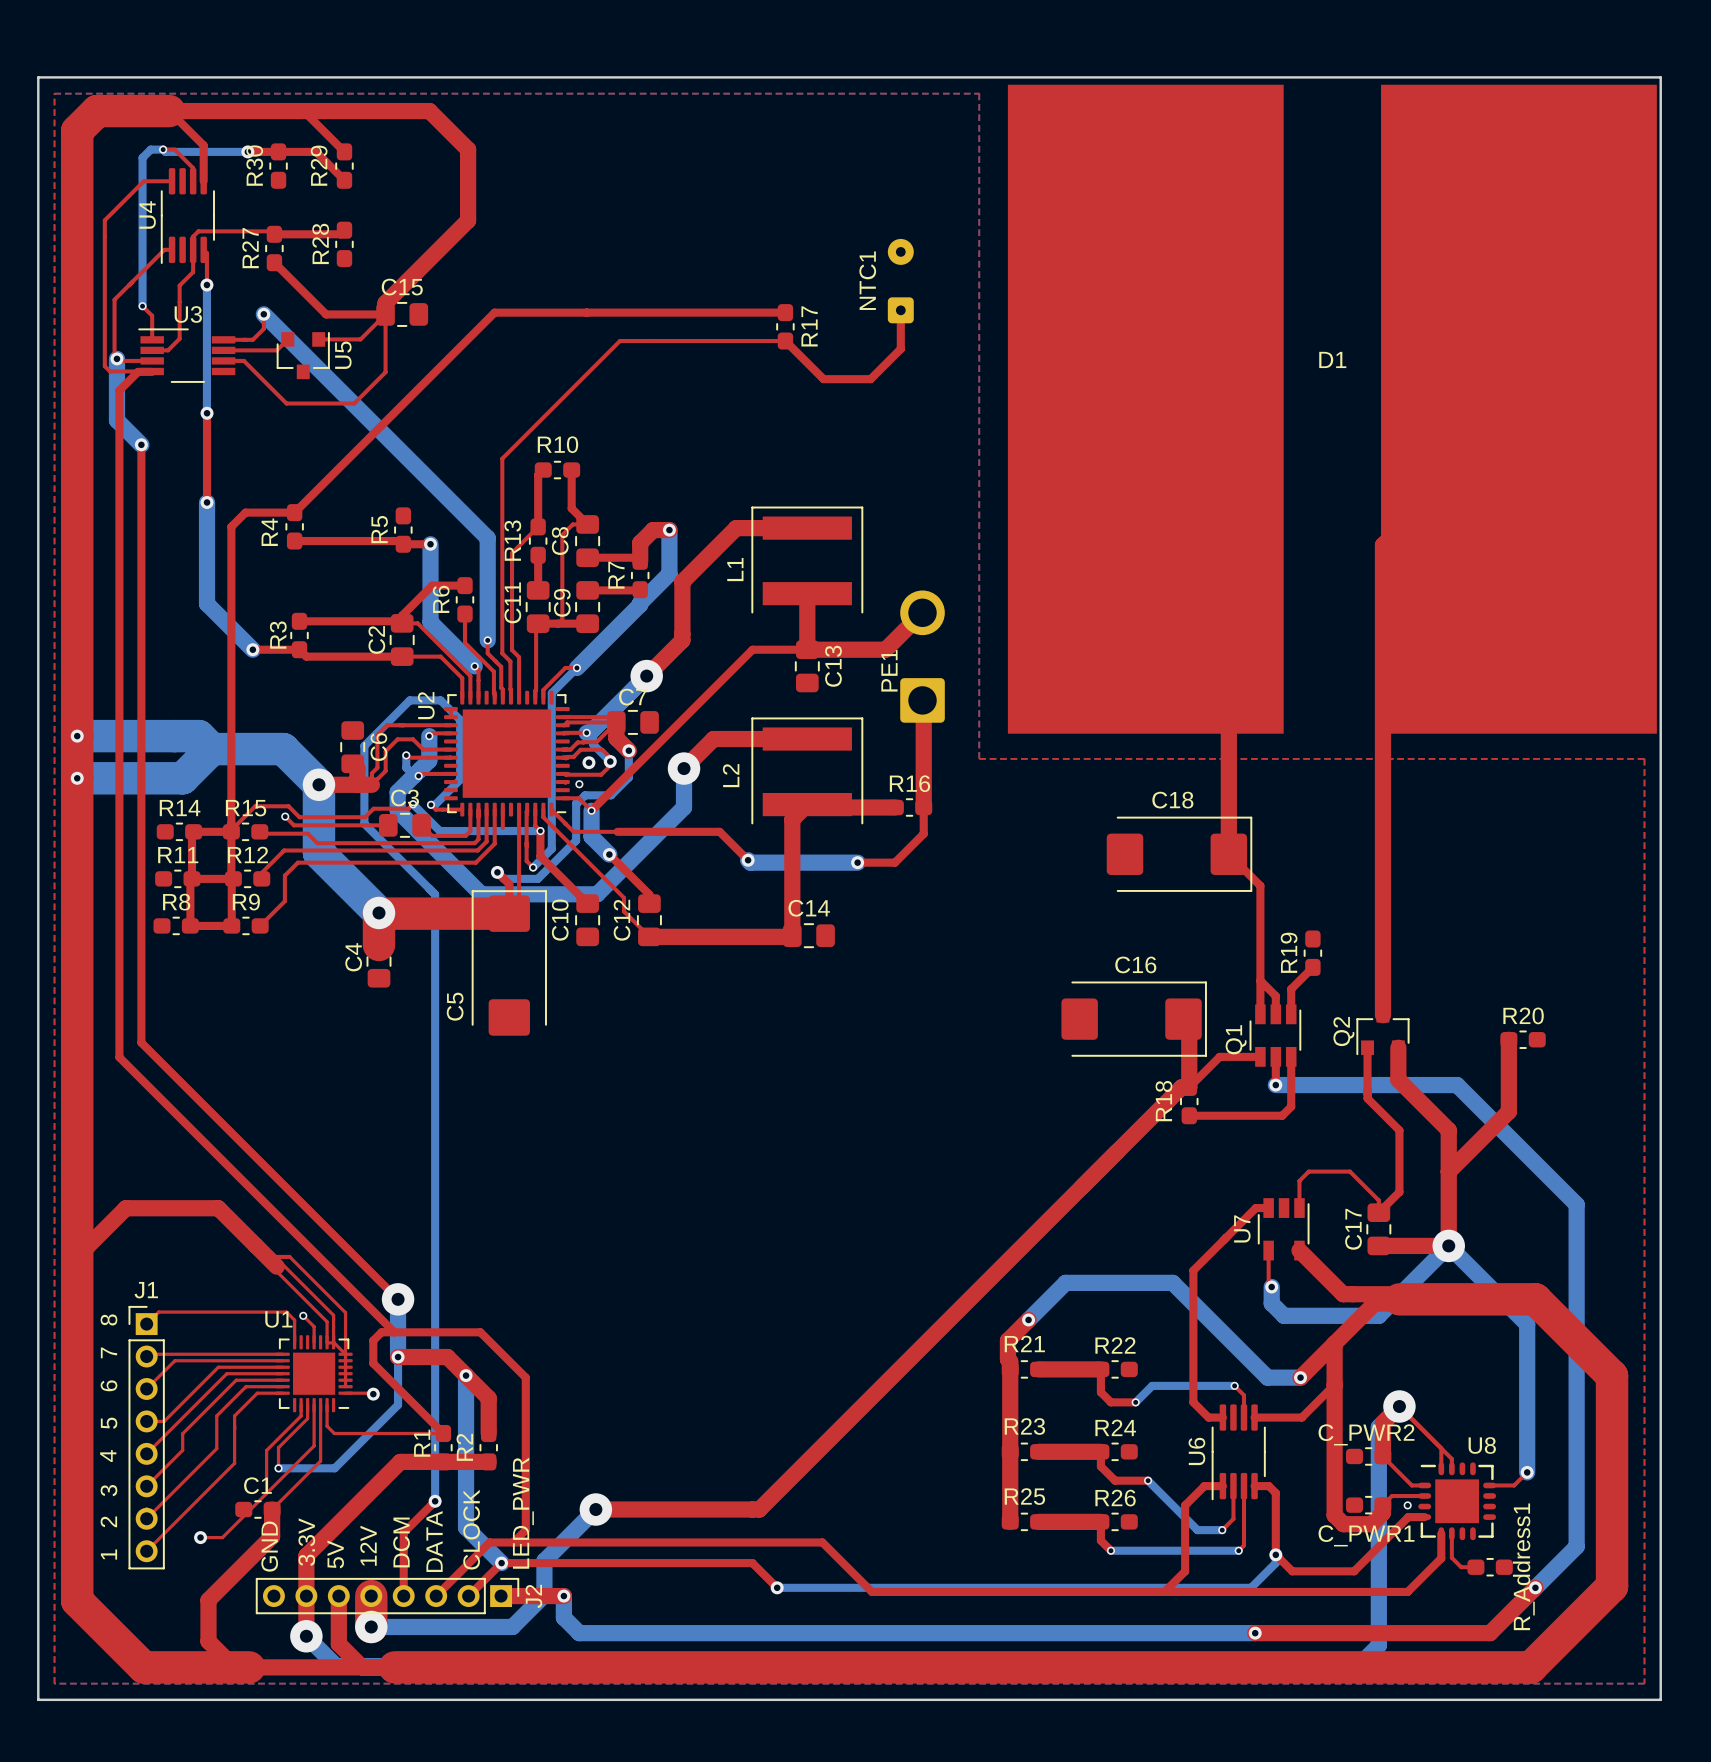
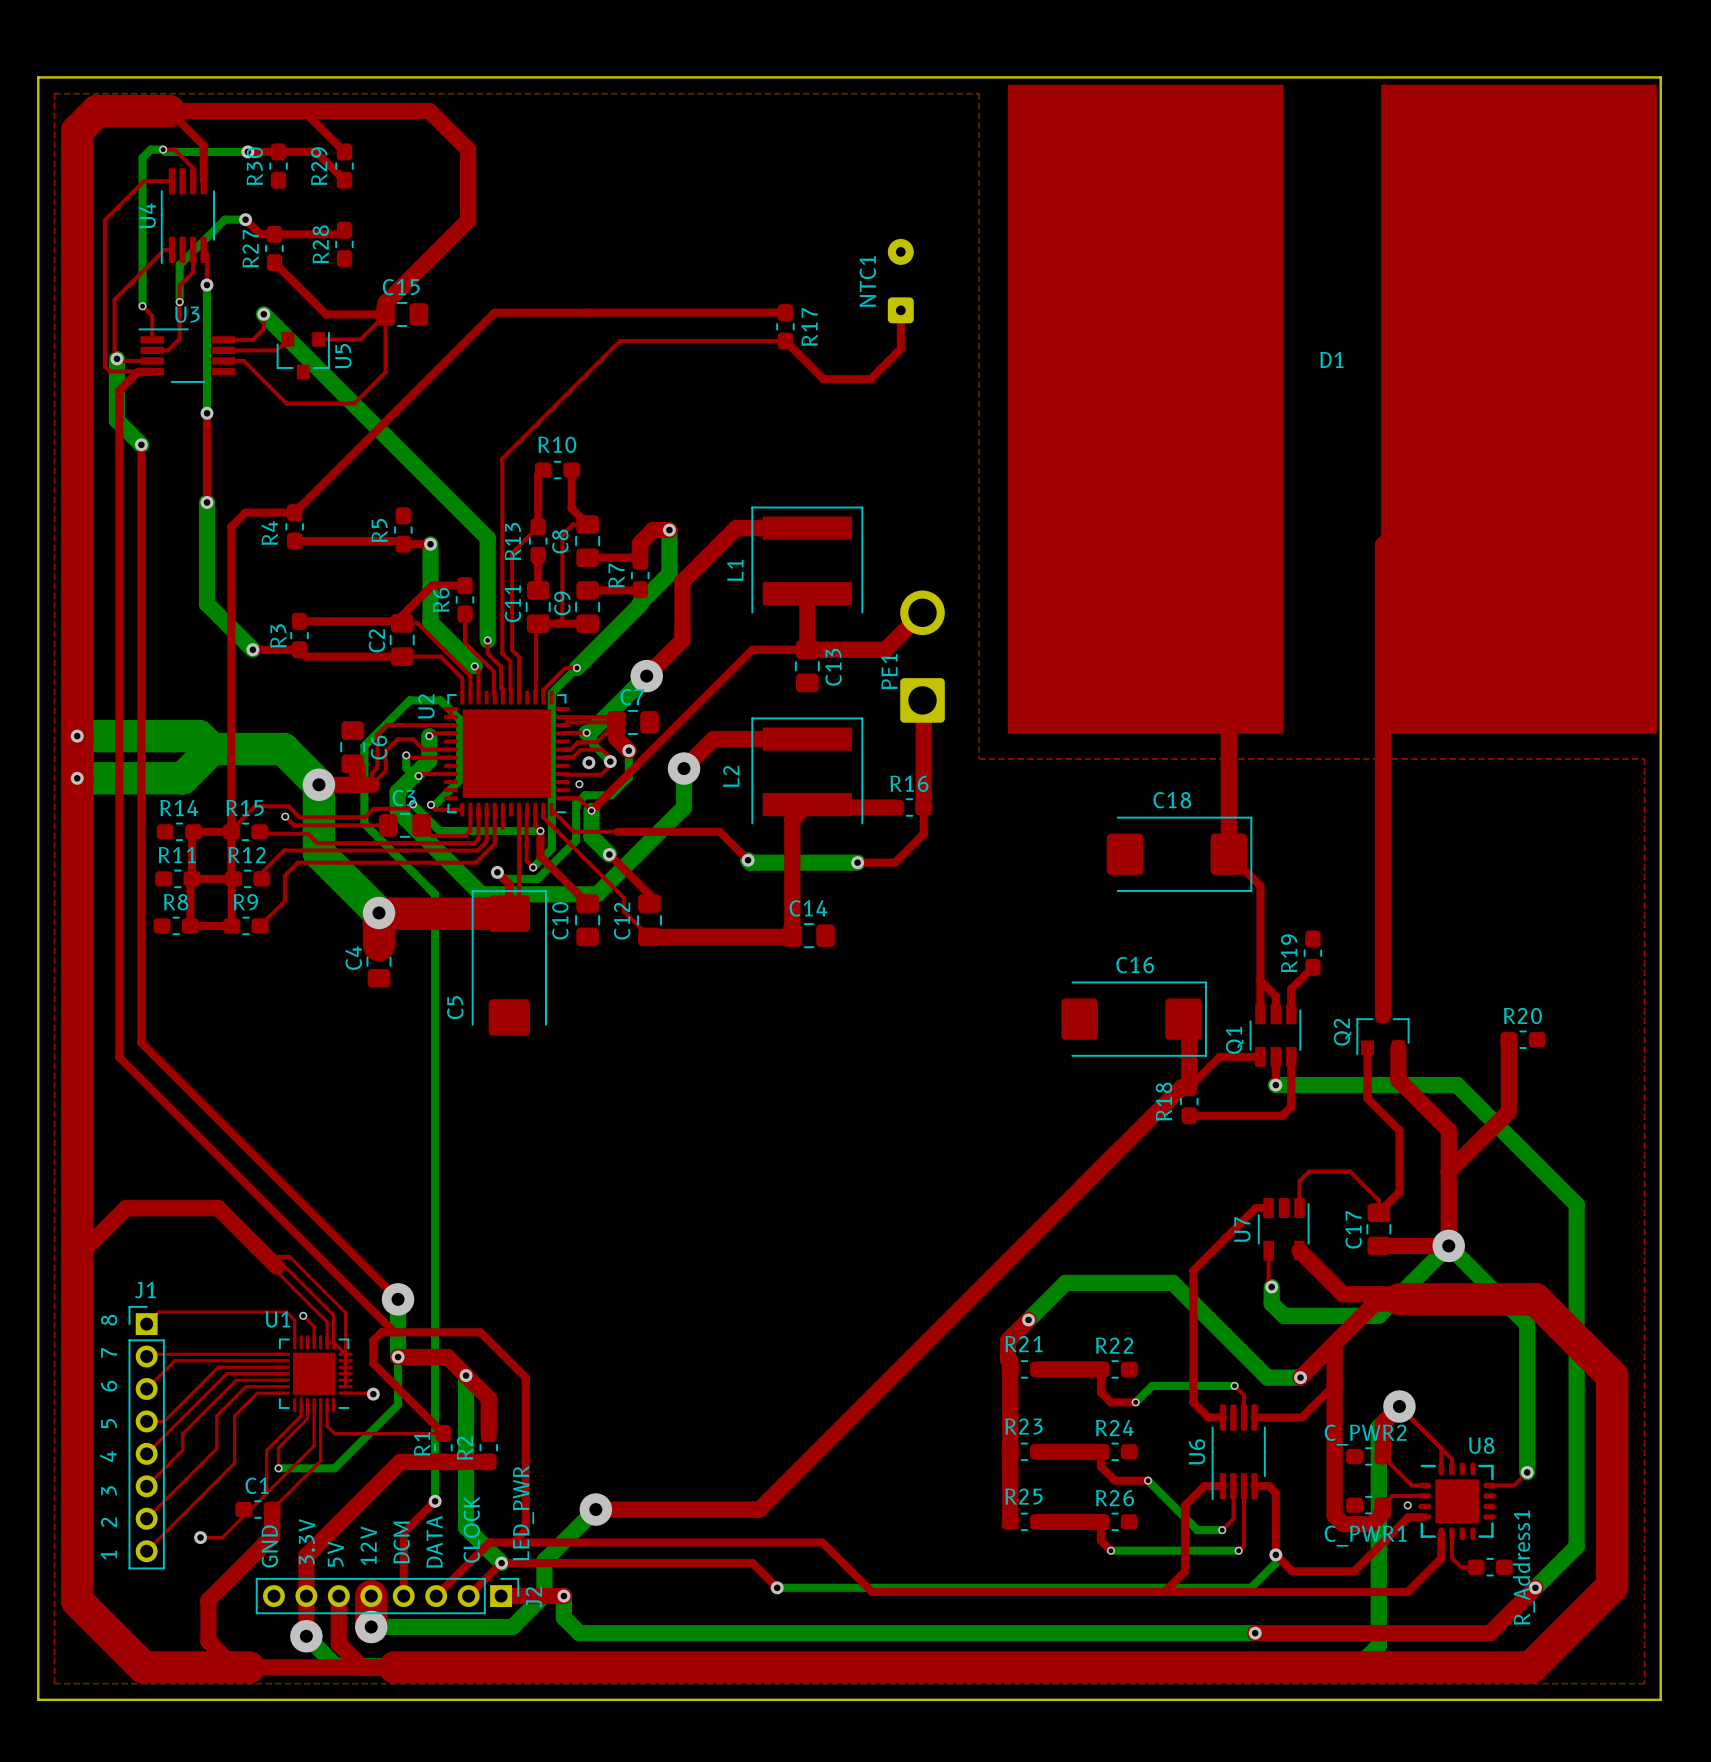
bottom track: none -> (245, 219) (224, 219) (179, 264) (179, 302)
via: none -> (245, 219)
top track: (274, 234) (271, 231) (198, 231) (193, 236) (193, 249) -> (274, 234) (260, 234) (245, 219)
via: none -> (179, 302)

